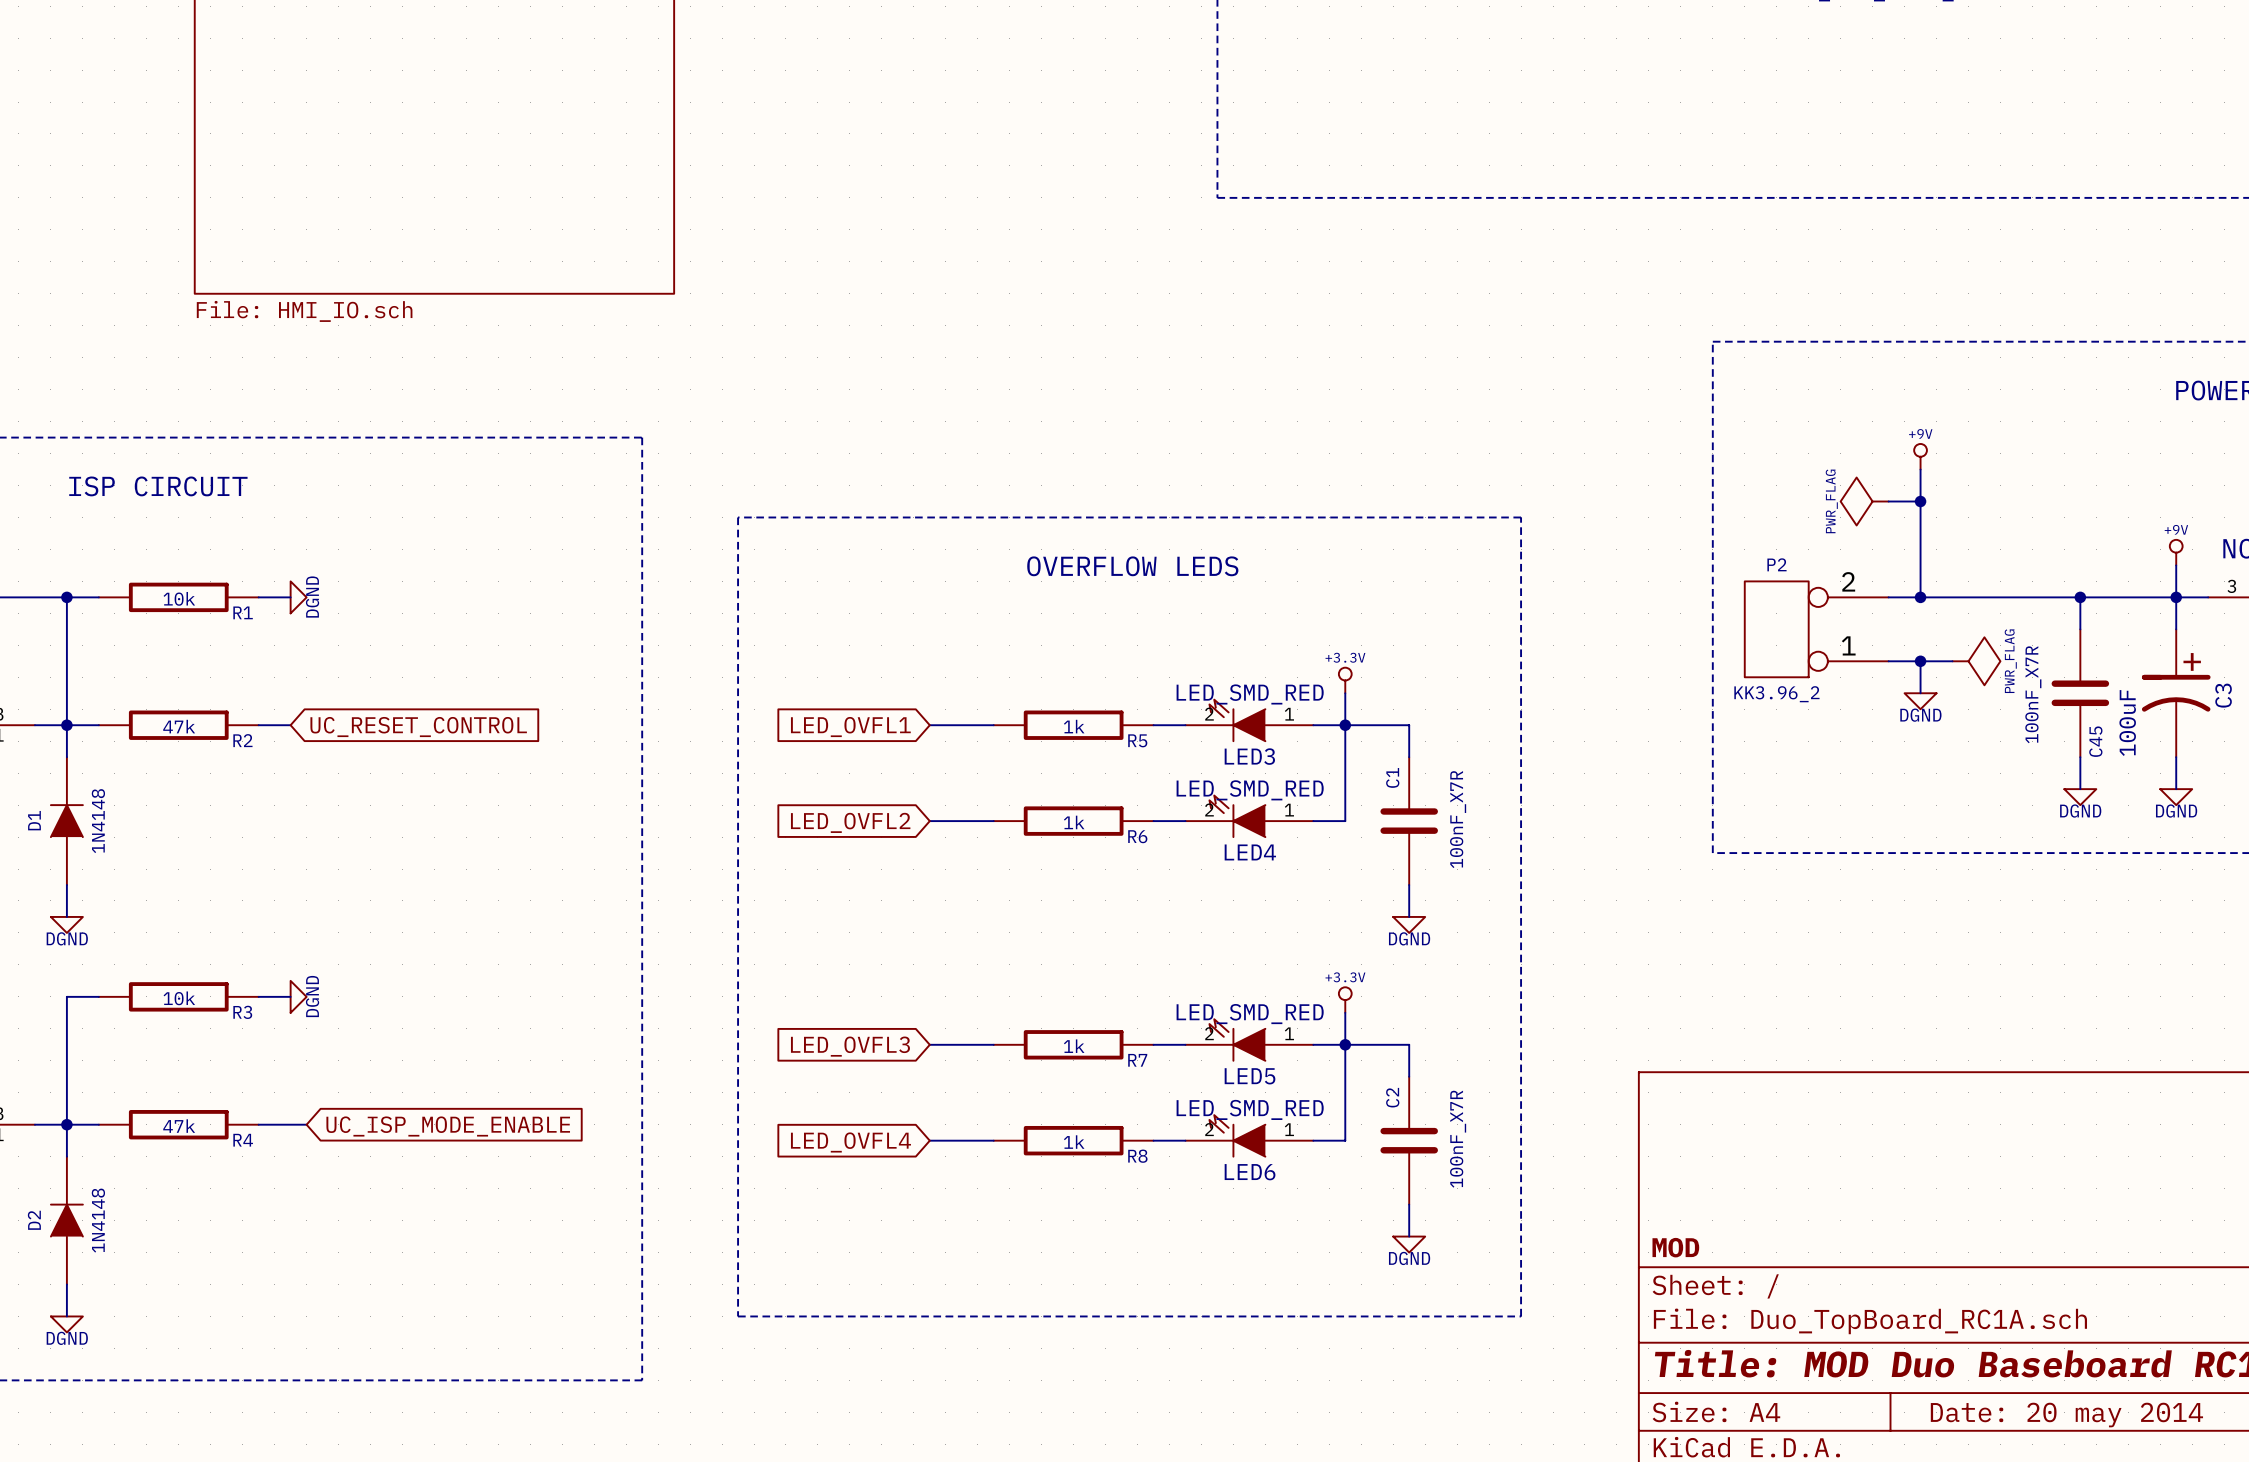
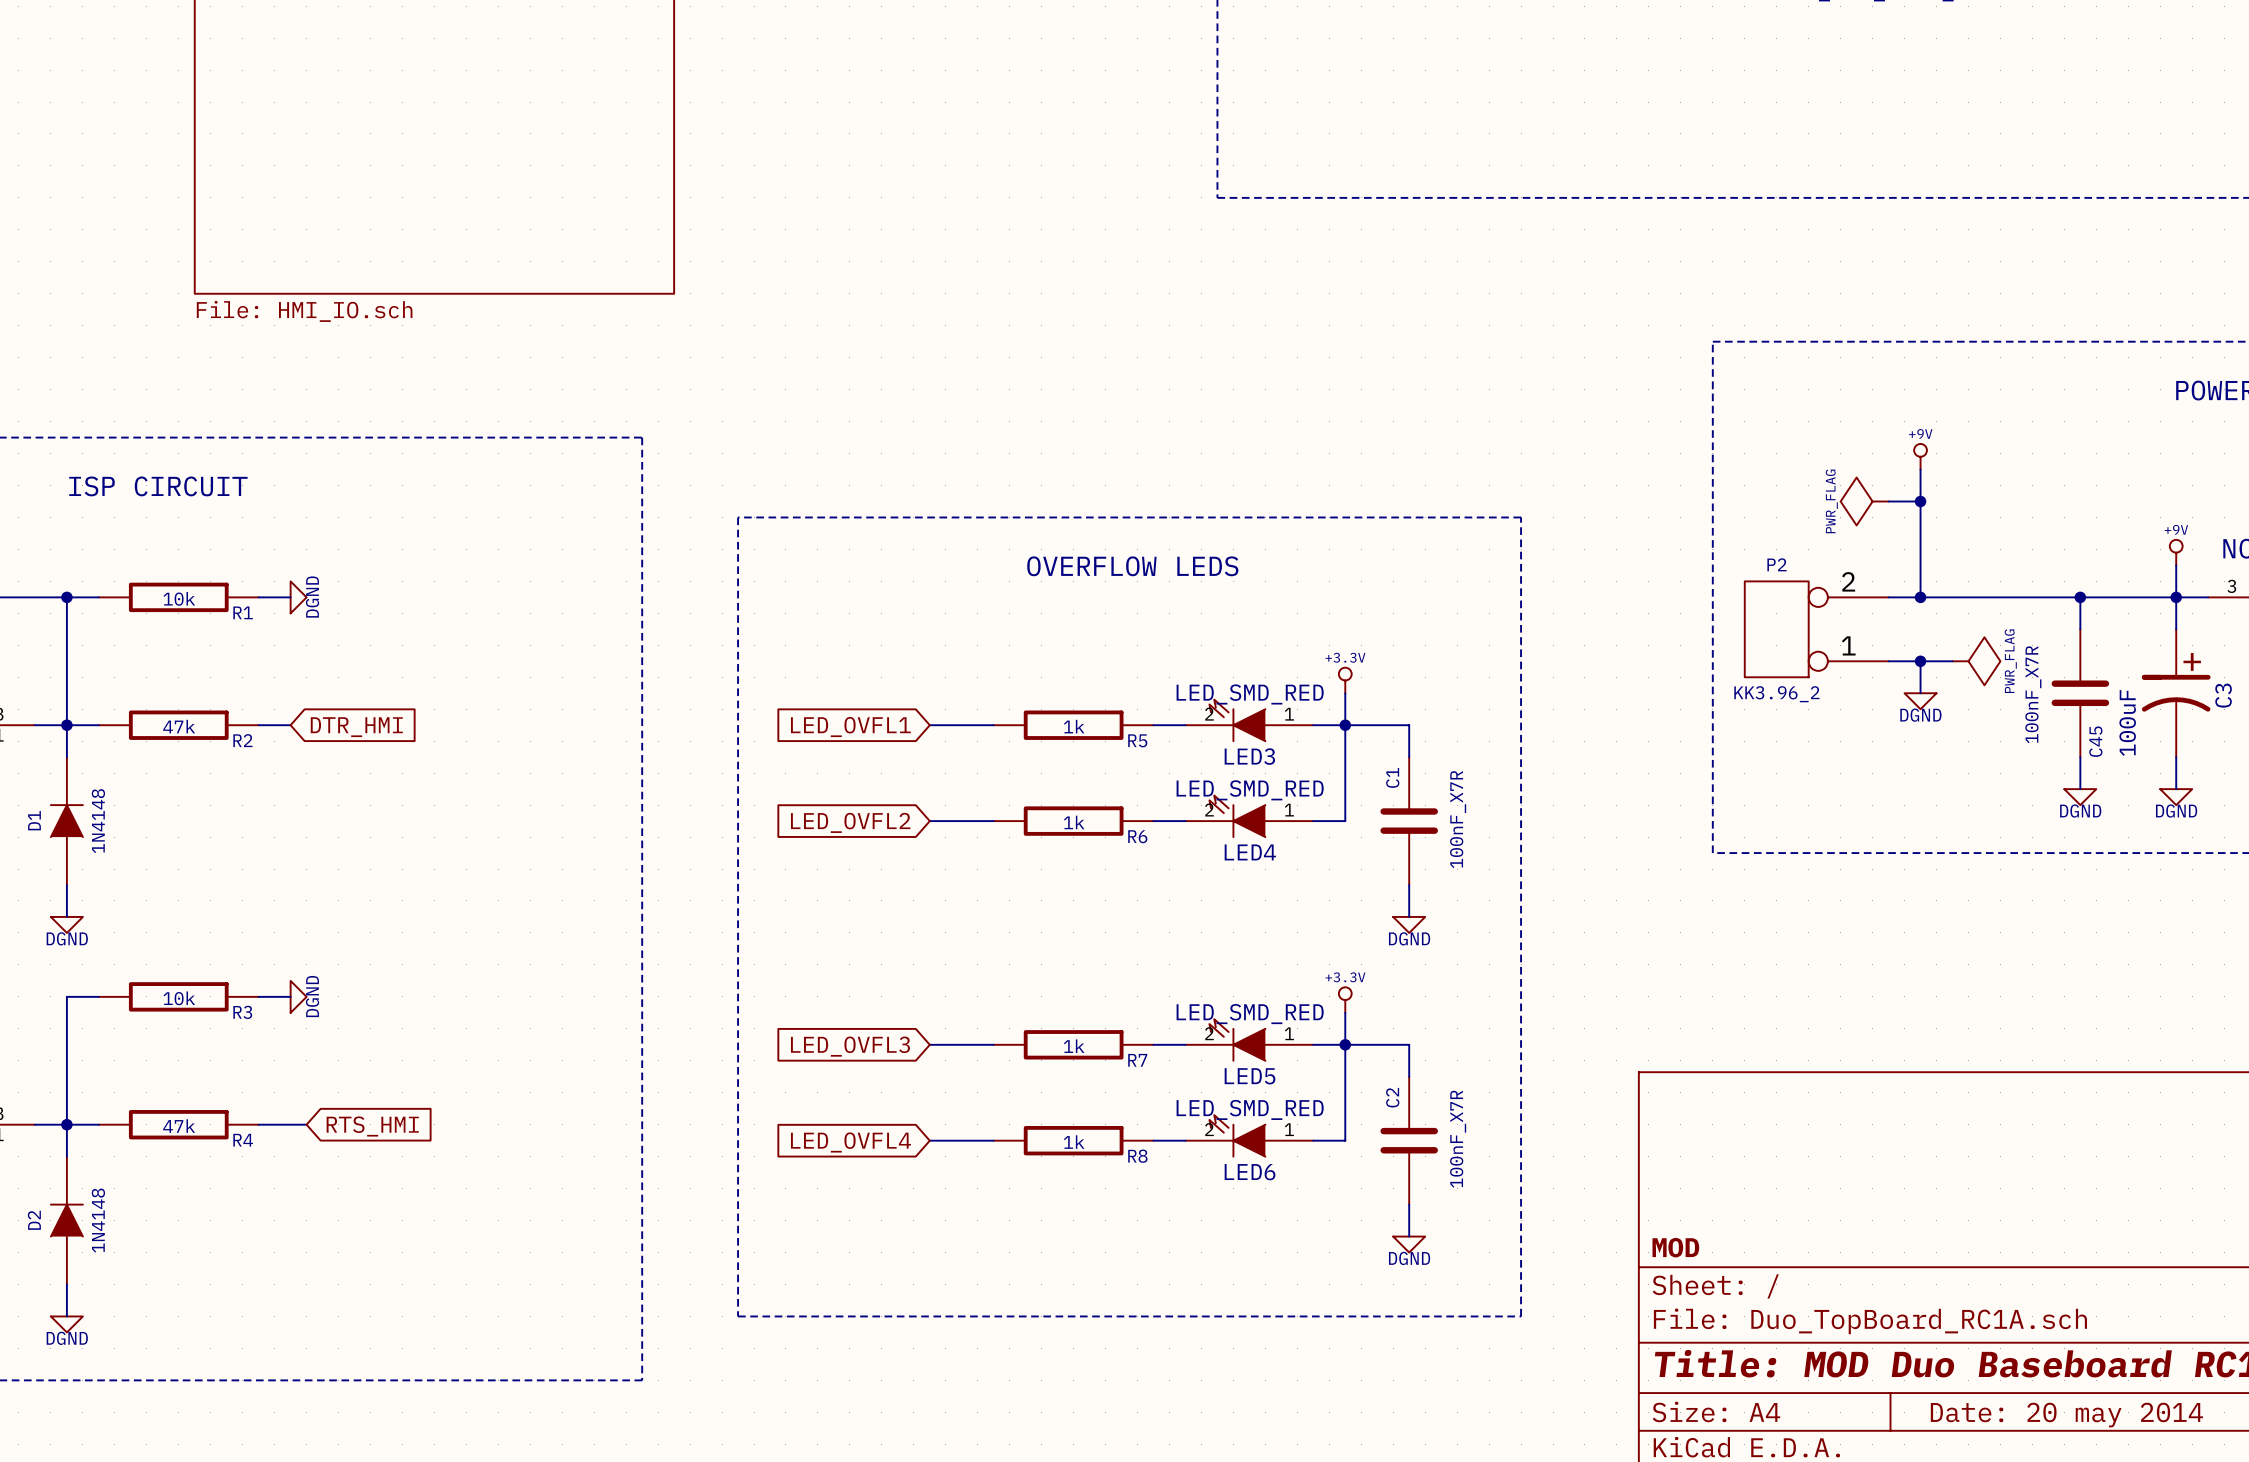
global label: UC_RESET_CONTROL (418, 727) -> DTR_HMI (356, 727)
global label: UC_ISP_MODE_ENABLE (448, 1126) -> RTS_HMI (372, 1126)

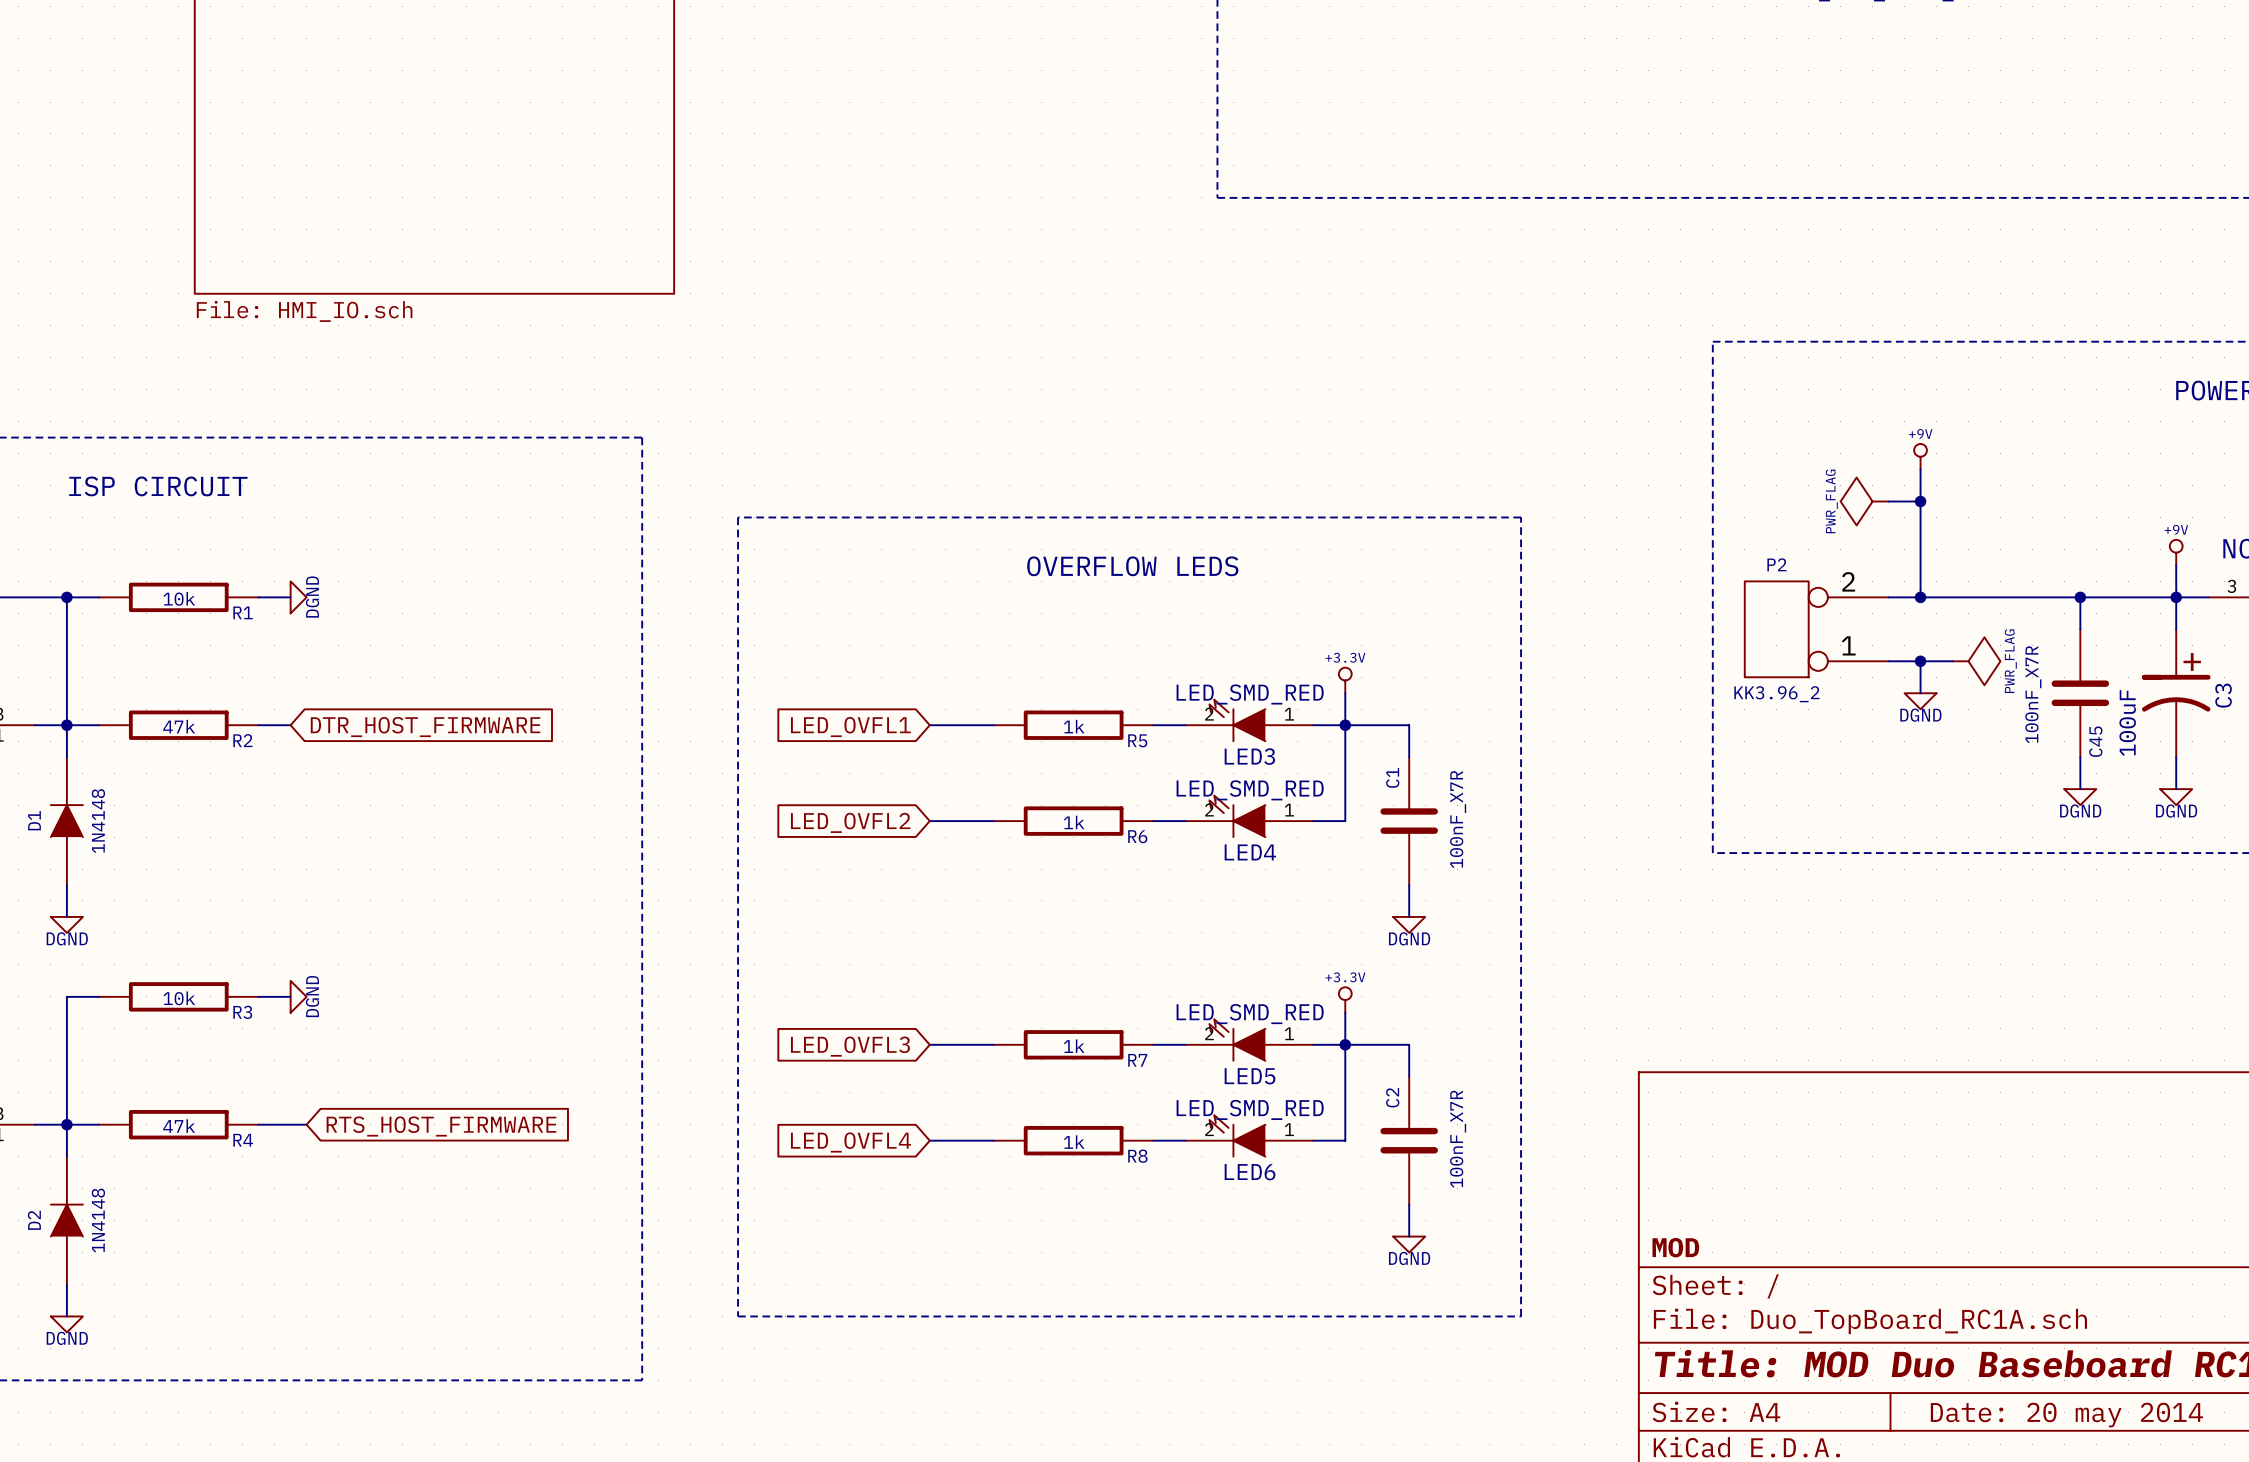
global label: DTR_HMI (356, 727) -> DTR_HOST_FIRMWARE (425, 727)
global label: RTS_HMI (372, 1126) -> RTS_HOST_FIRMWARE (441, 1126)

